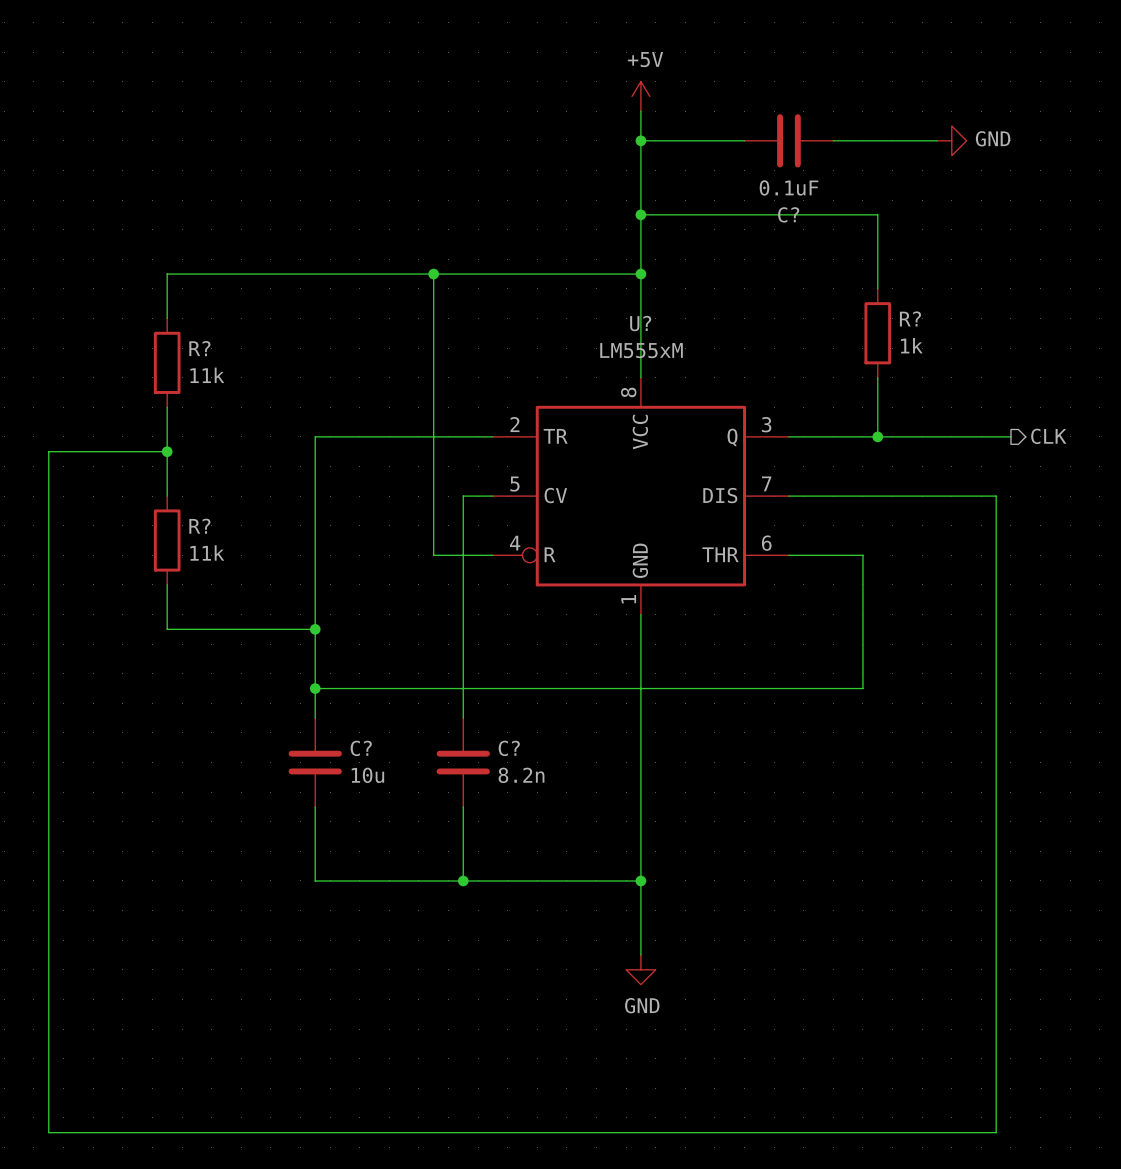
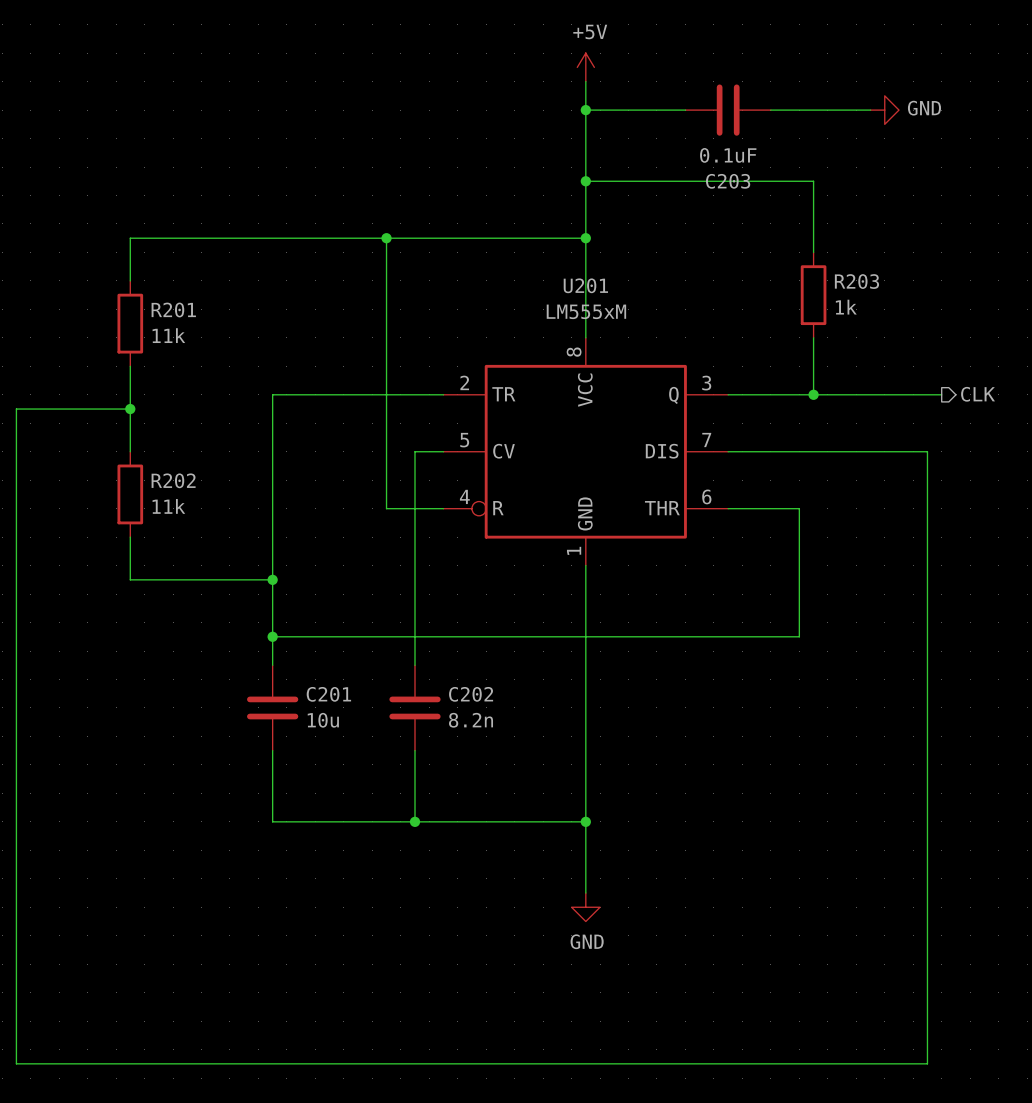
C? name: C? (788, 214) -> C203 (728, 181)
R? name: R? (910, 318) -> R203 (856, 281)
U? name: U? (640, 323) -> U201 (585, 285)
R? name: R? (199, 348) -> R201 (173, 310)
R? name: R? (199, 526) -> R202 (173, 480)
C? name: C? (361, 748) -> C201 (328, 694)
C? name: C? (509, 748) -> C202 (471, 694)

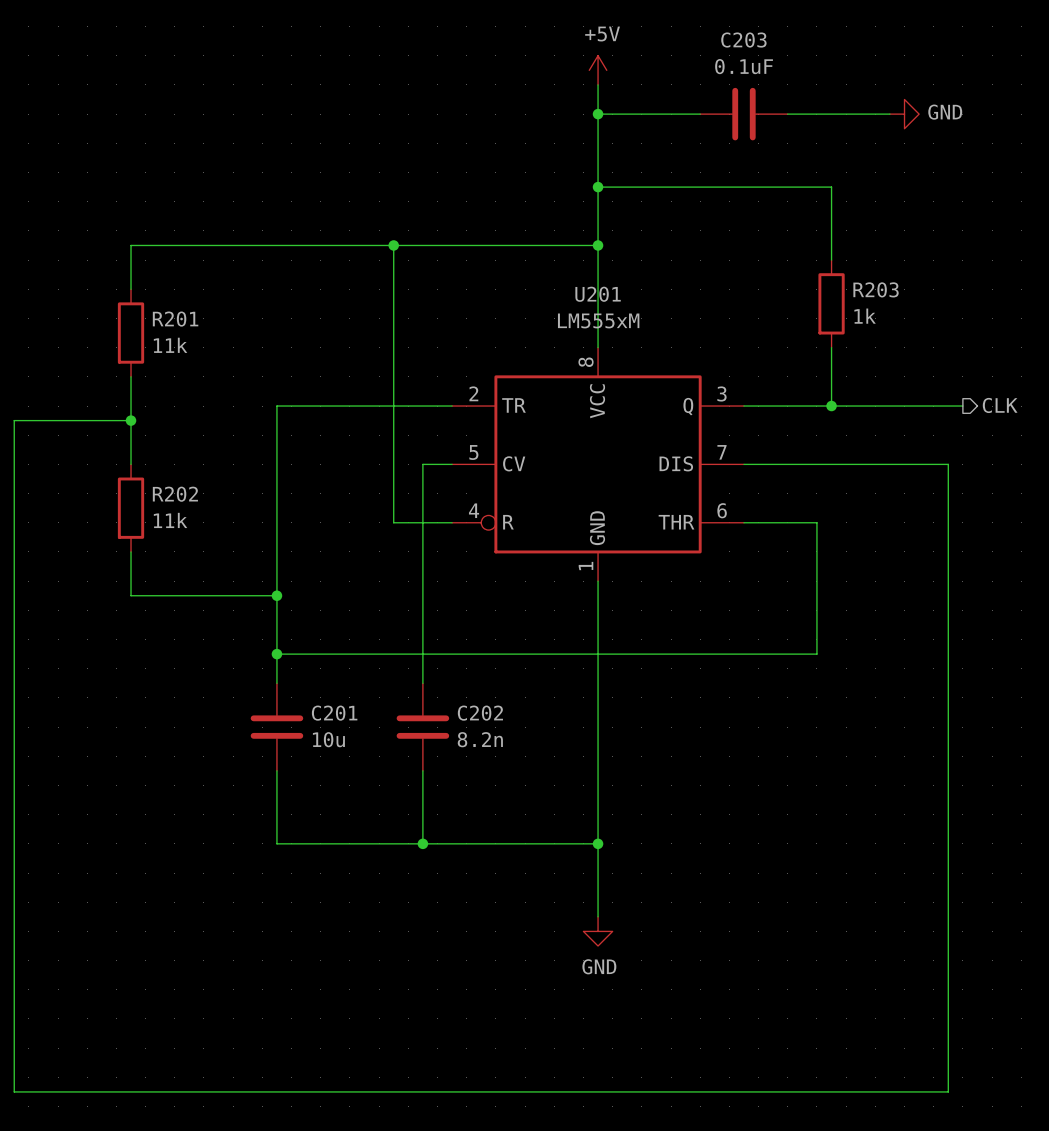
C203 value position: 0.1uF (728, 155) -> 0.1uF (744, 66)
C203 name position: C203 (728, 181) -> C203 (743, 40)

